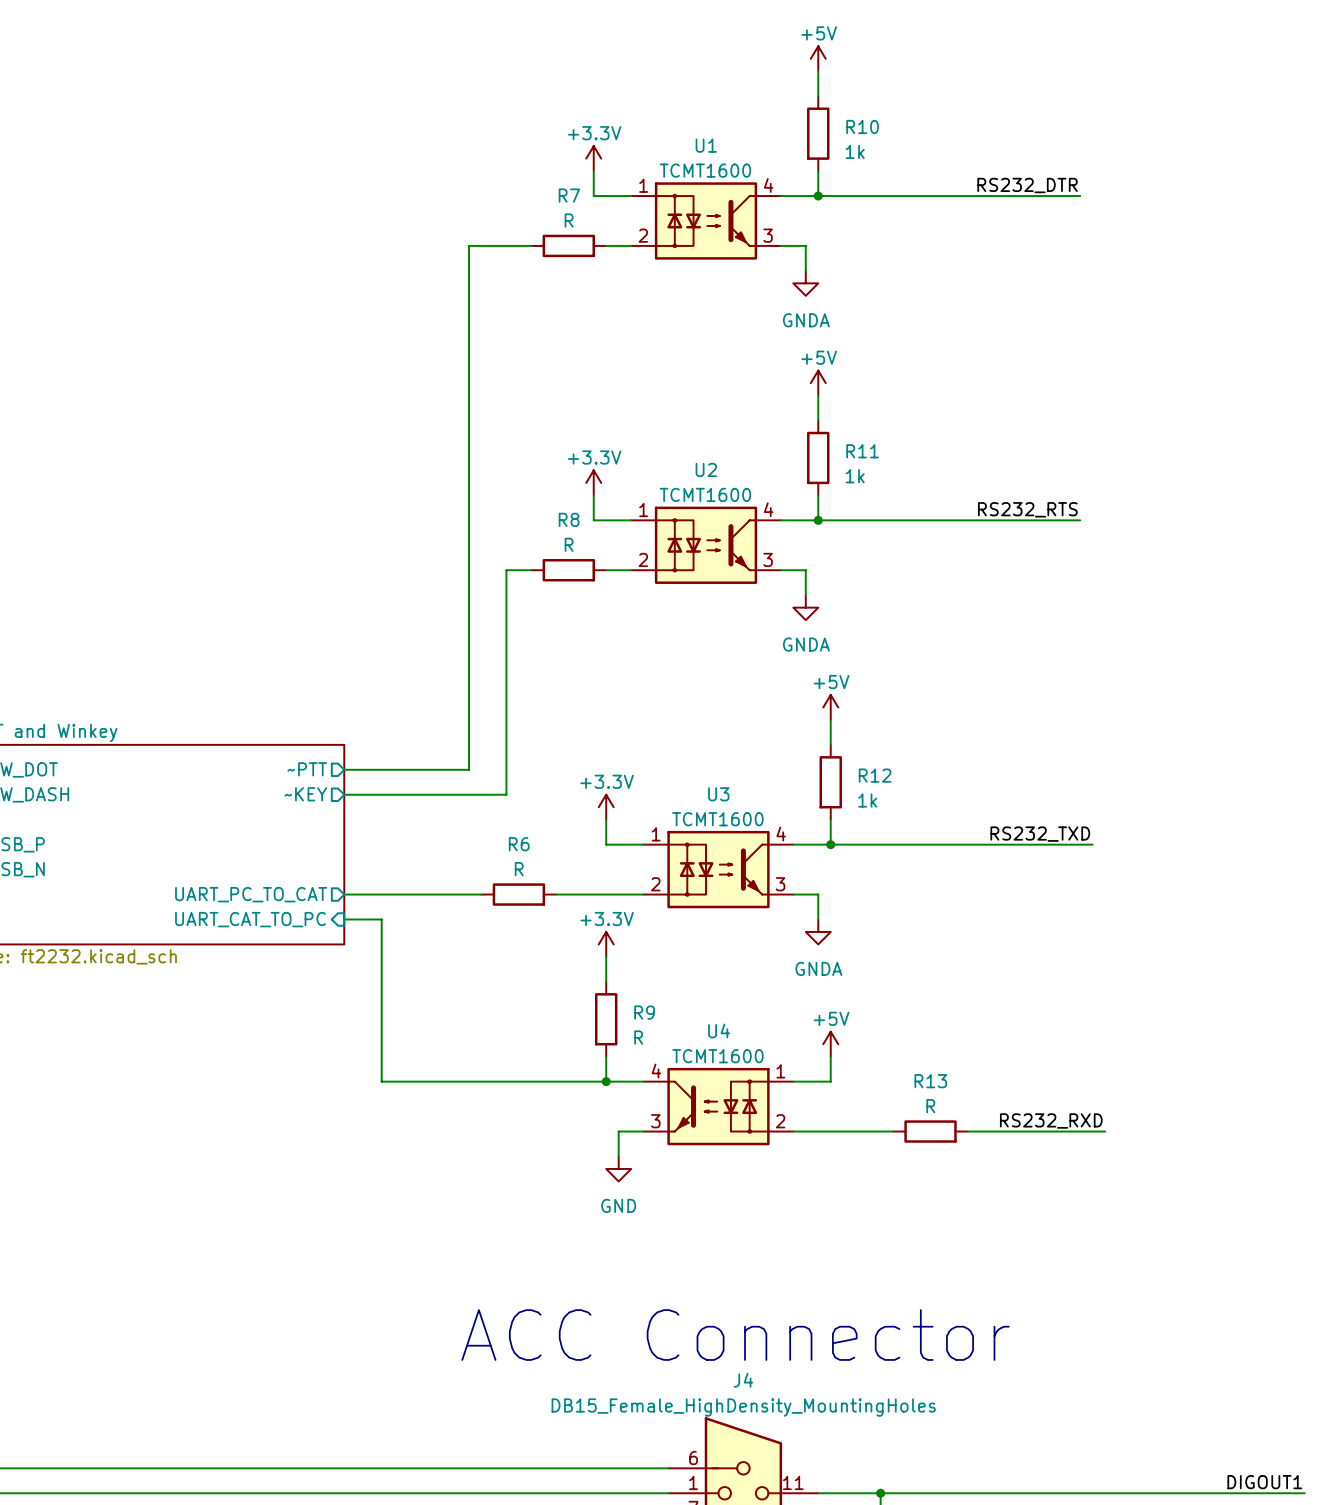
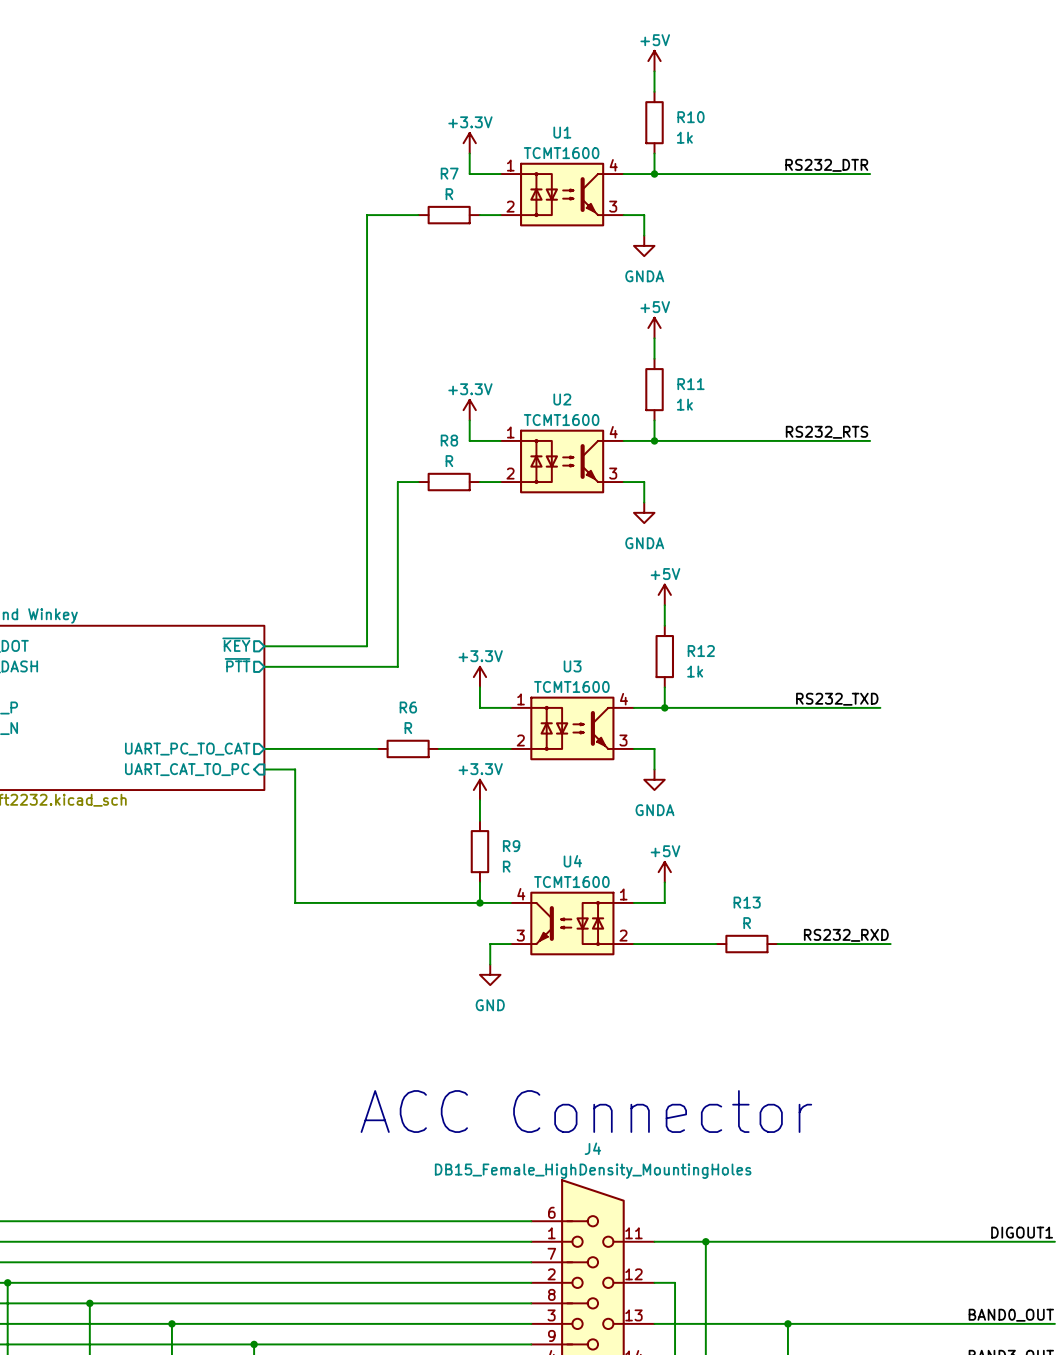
sheet pin: ~PTT (307, 769) -> ~{KEY} (236, 644)
sheet pin: ~KEY (305, 794) -> ~{PTT} (237, 665)

